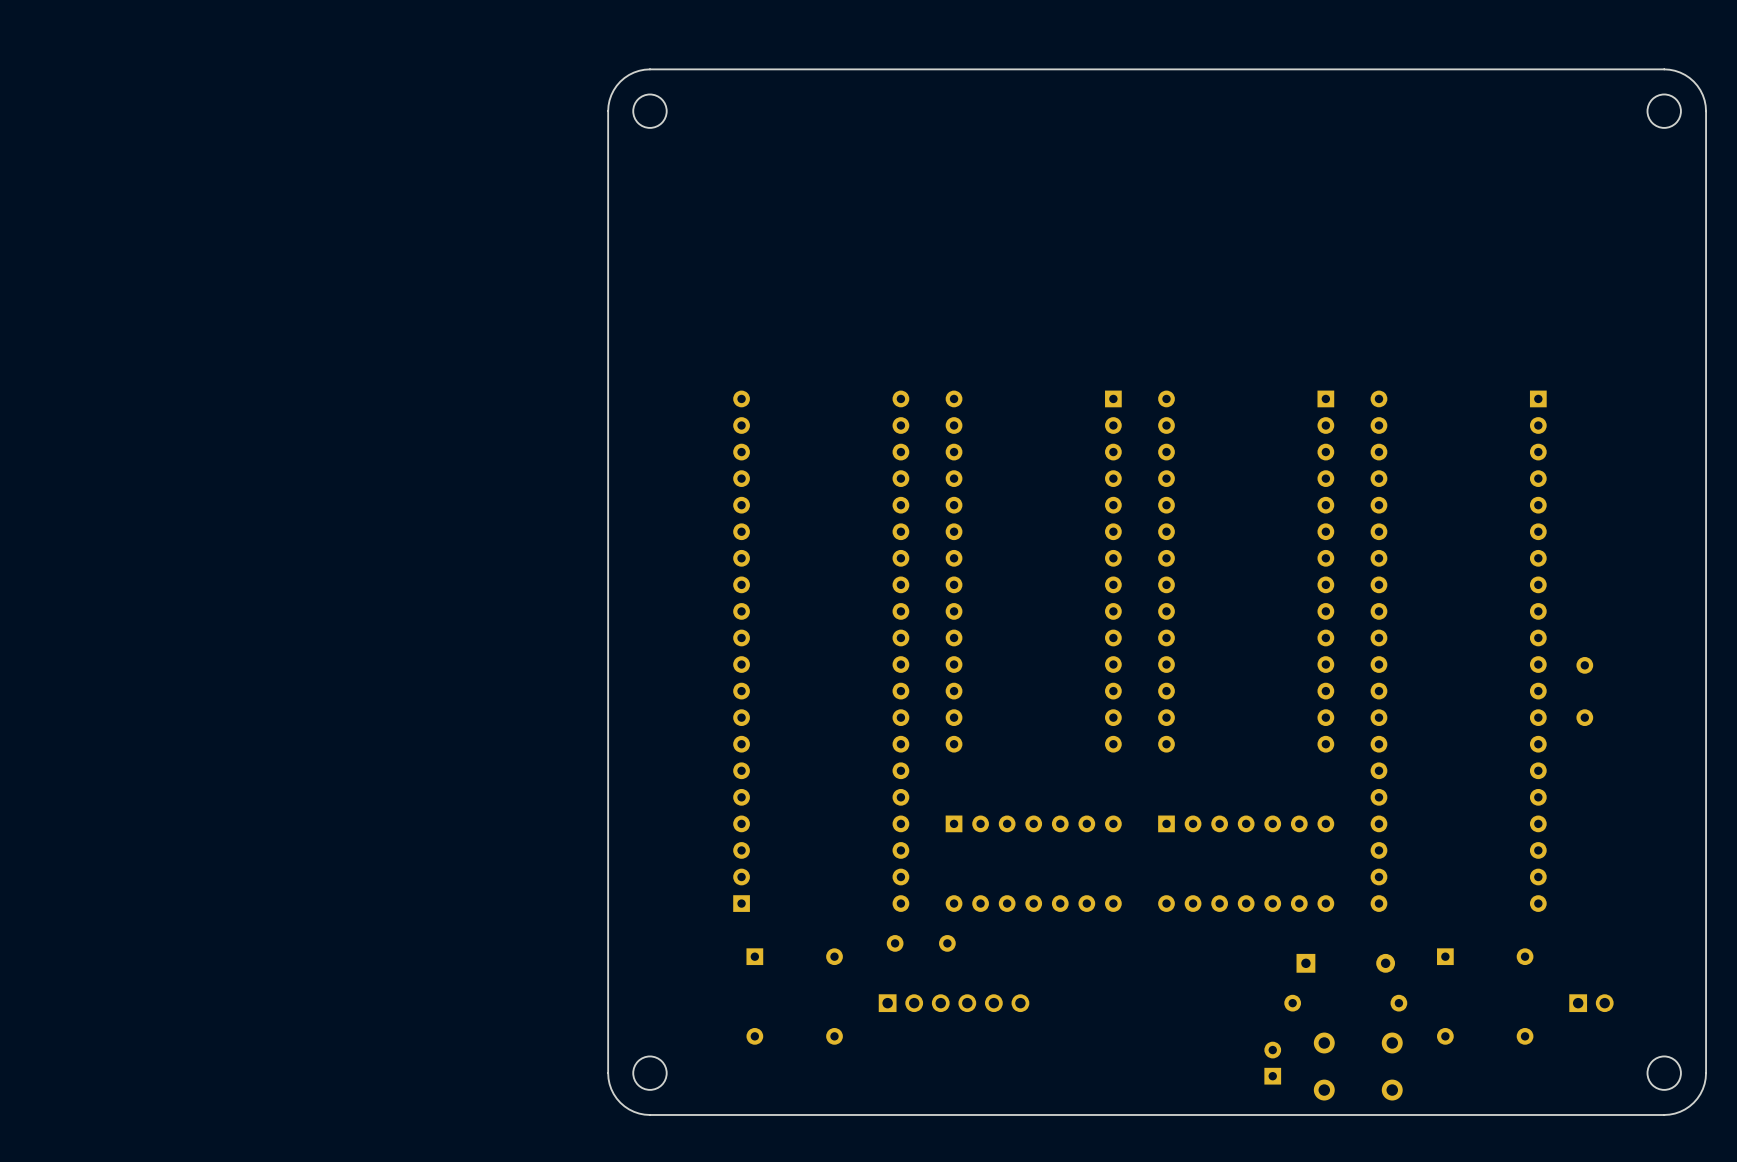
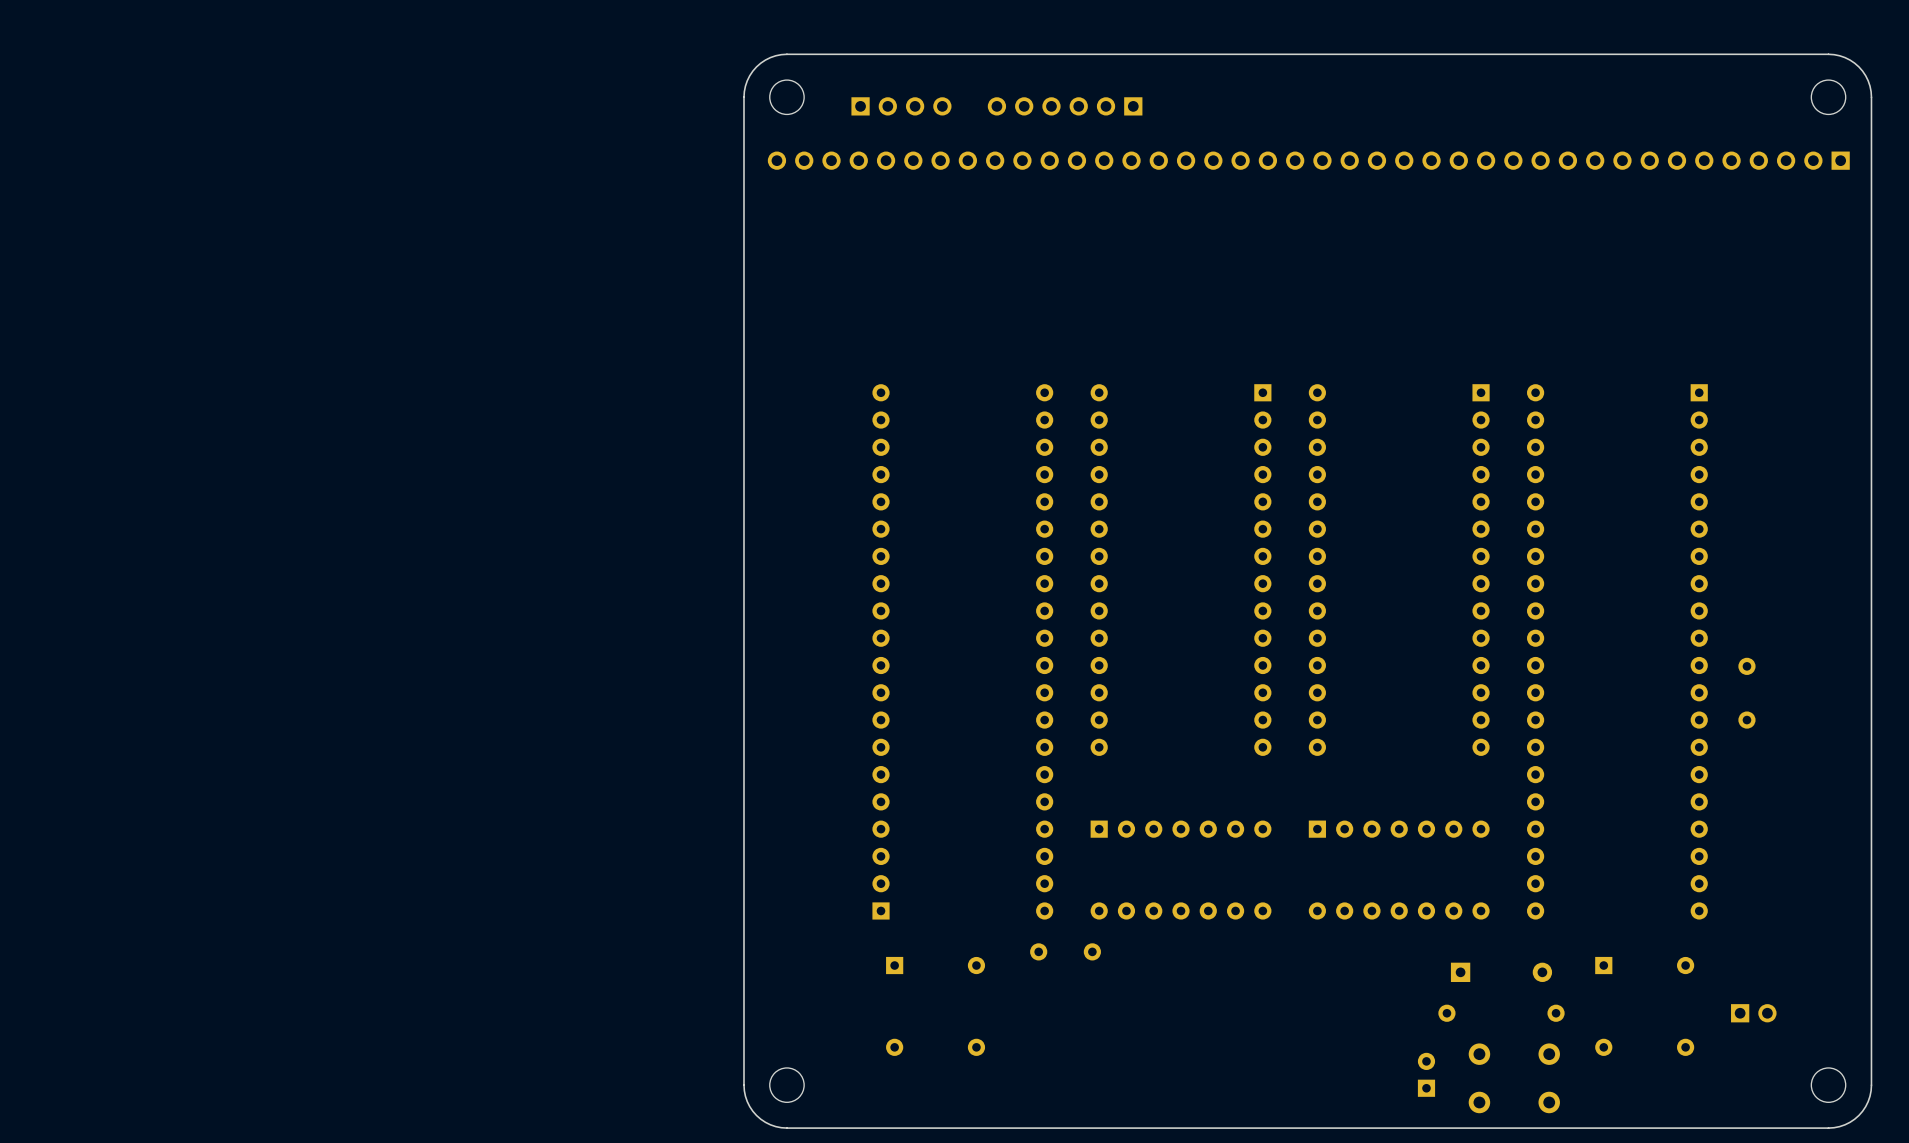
part: none -> (901, 106)
part: none -> (1065, 106)
part: none -> (1308, 160)
part: (954, 1003) -> none

